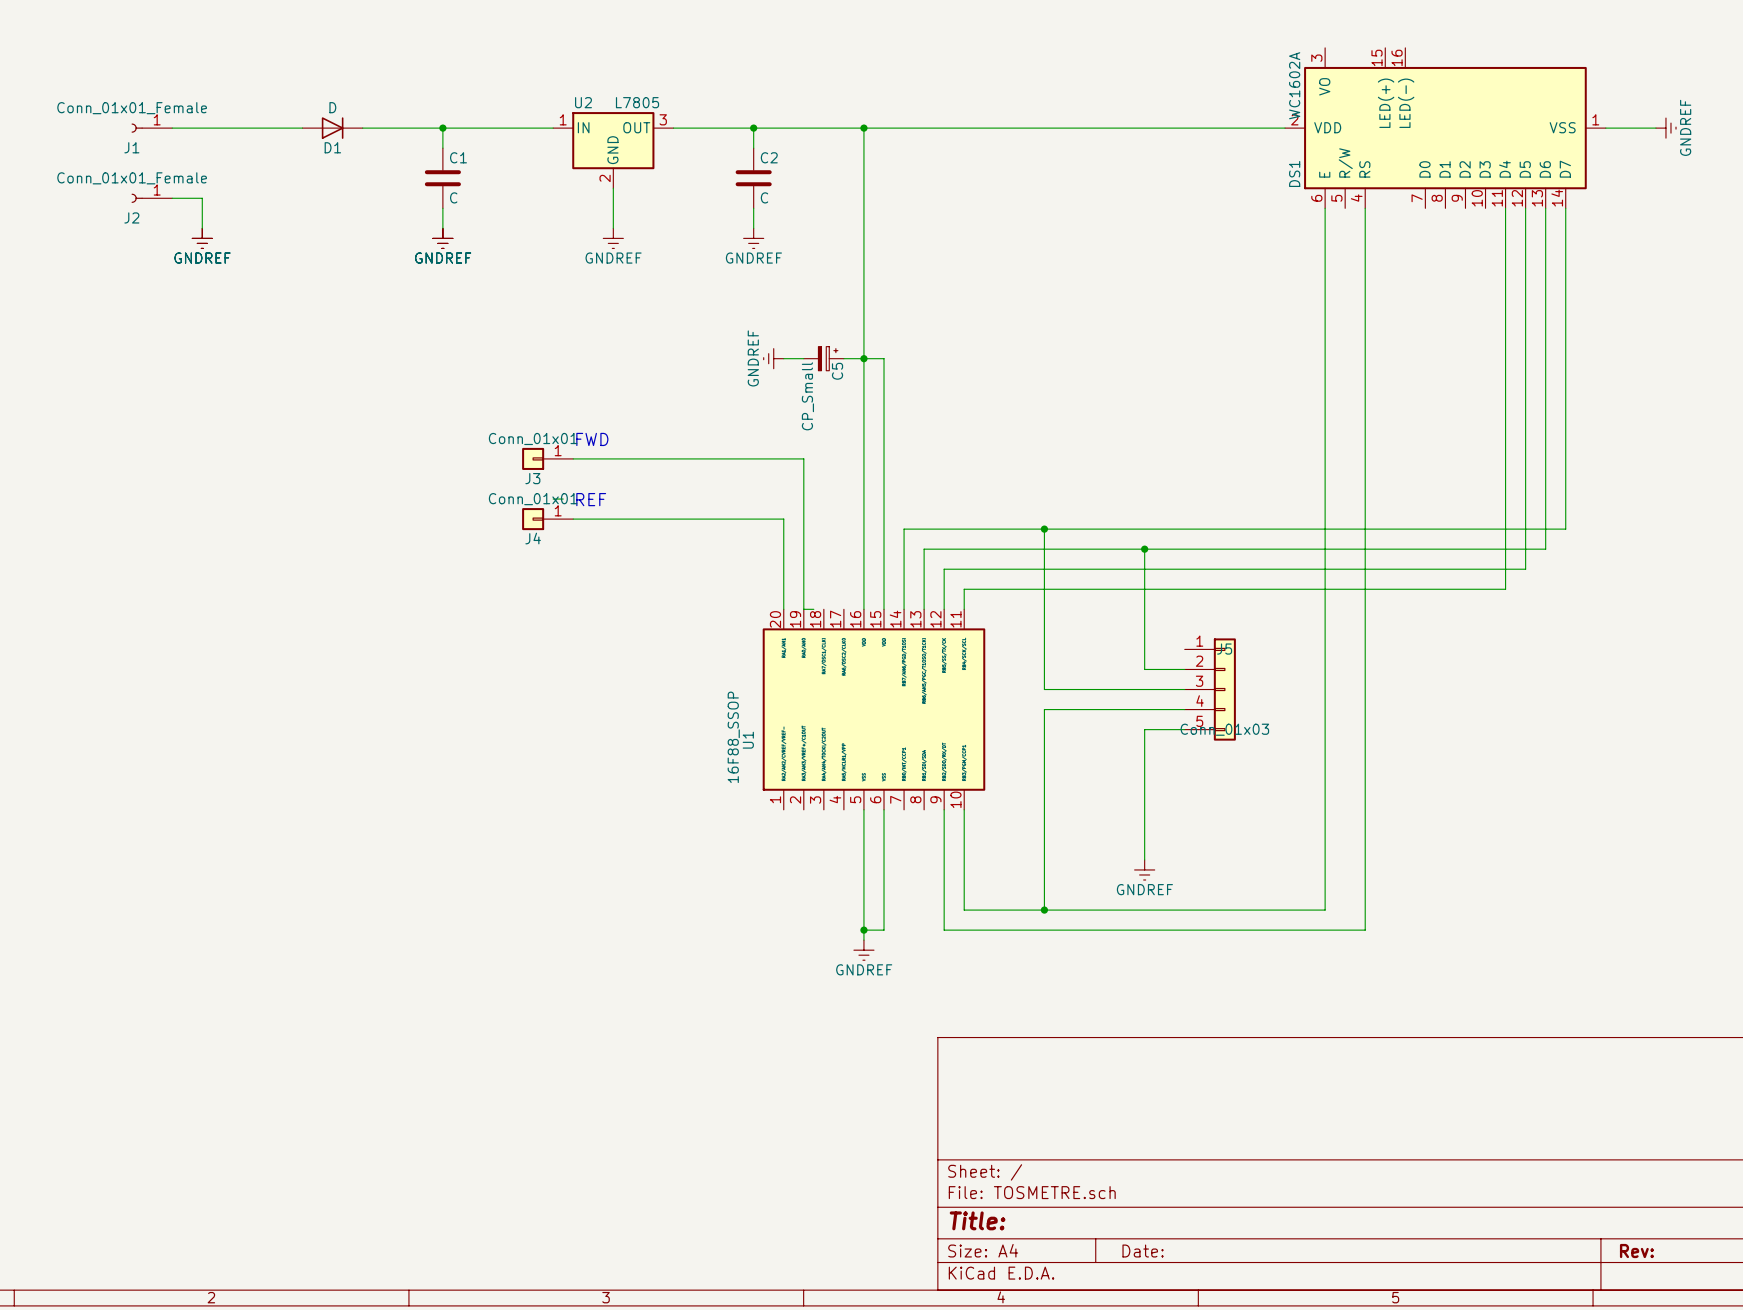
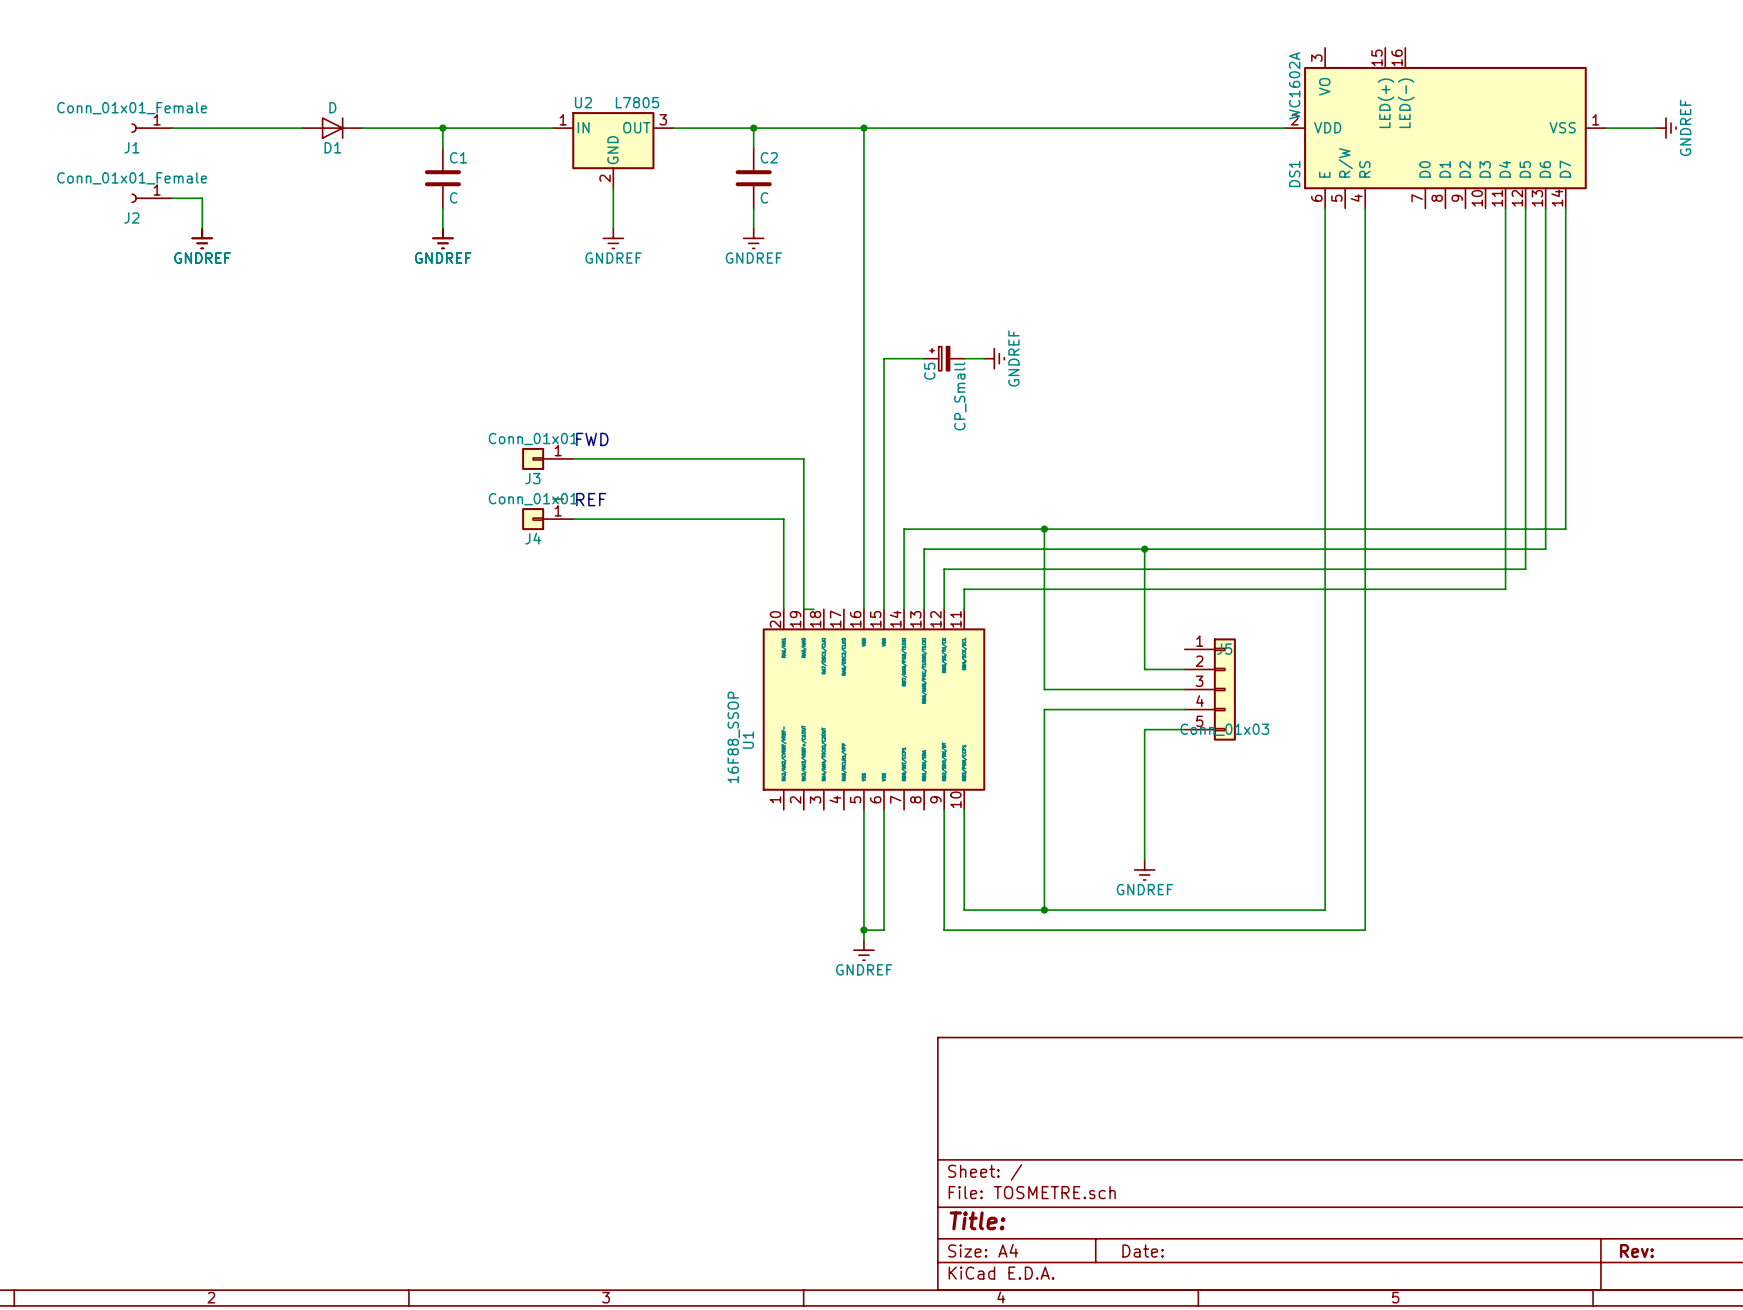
power symbol: GNDREF (773, 358) -> none
wire: (783, 358) (803, 358) -> (964, 358) (984, 358)
C5 position: (823, 358) -> (944, 358)
C5 flip: as is (828, 358) -> left-right (939, 358)
wire: (843, 358) (884, 358) -> (924, 358) (884, 358)
junction: (863, 358) -> none
power symbol: none -> GNDREF (994, 358)

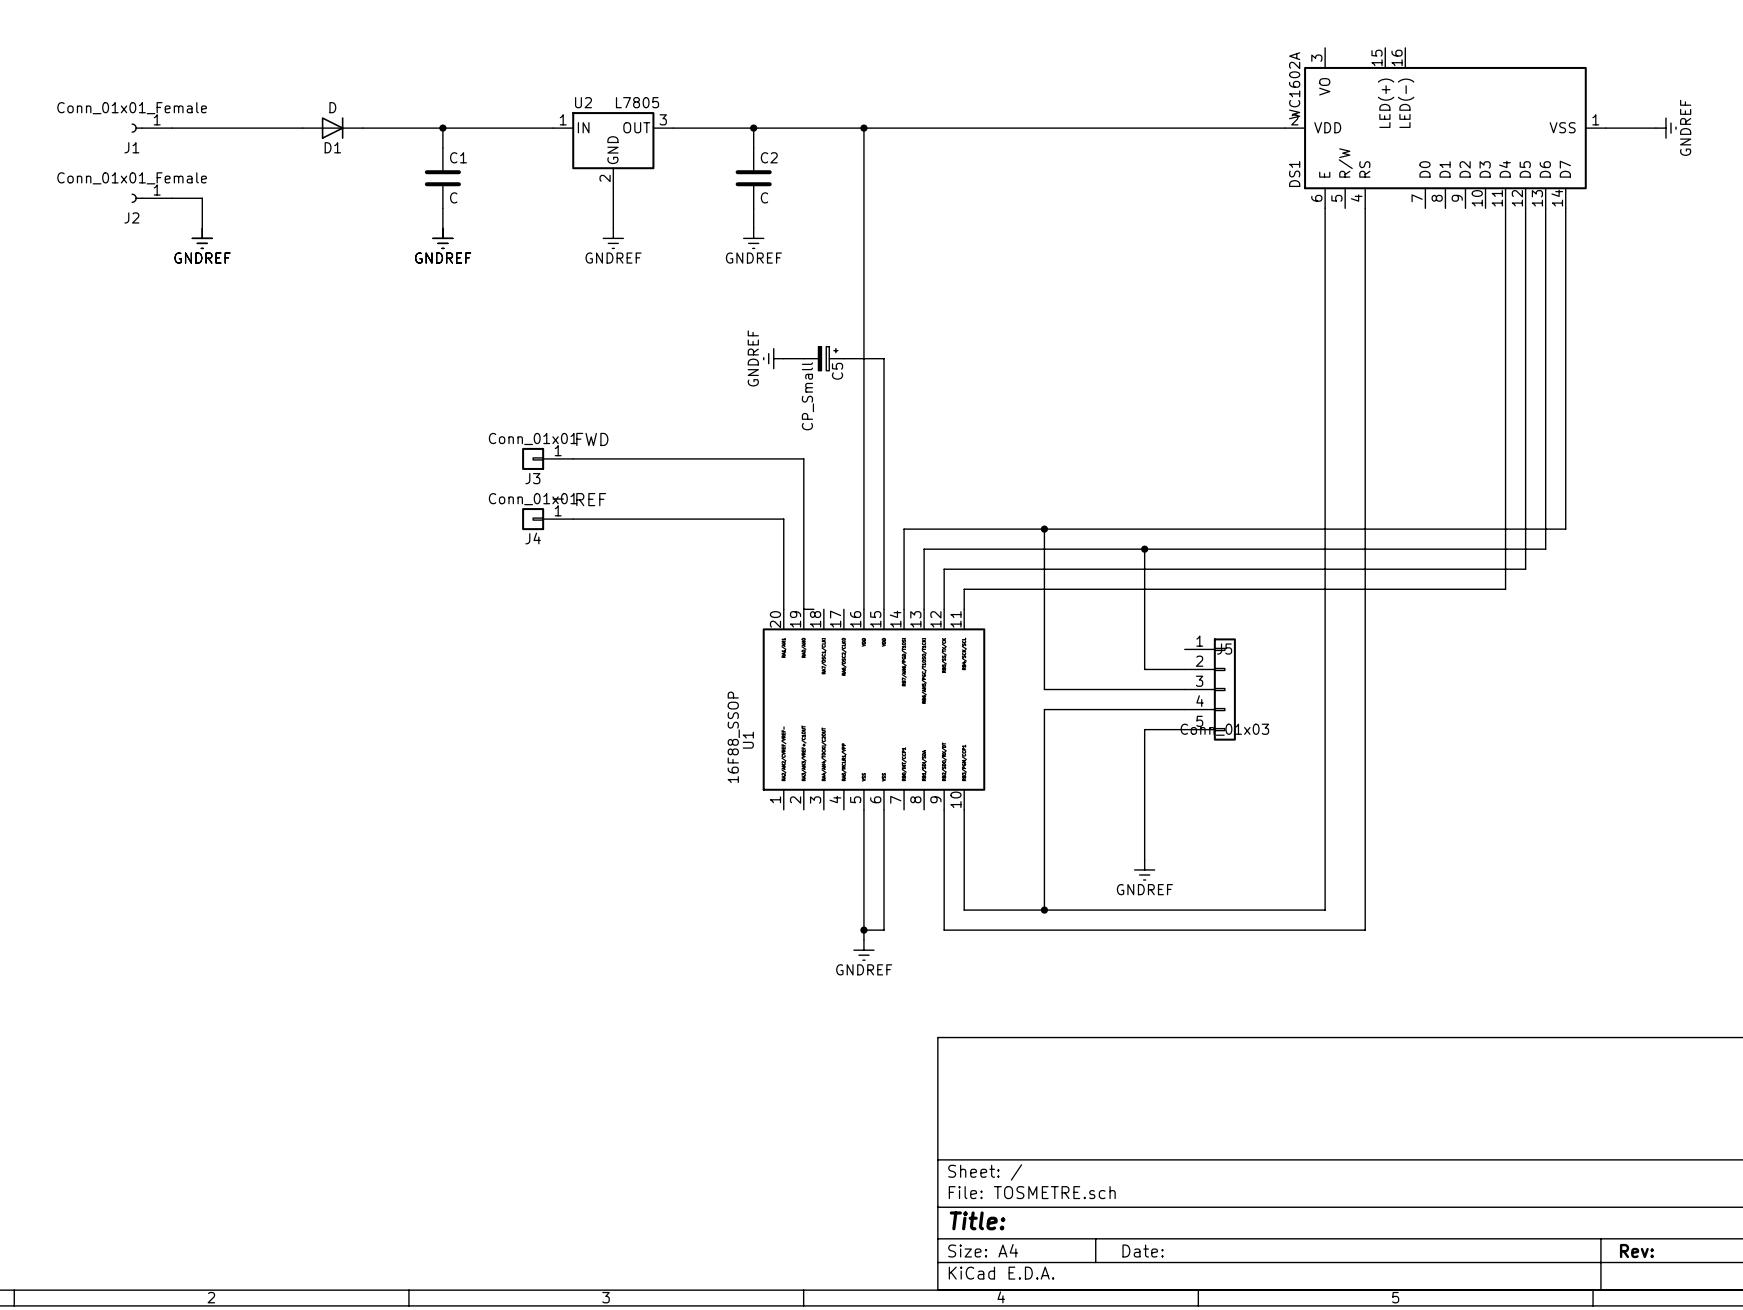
power symbol: none -> GNDREF (773, 358)
wire: (884, 358) (924, 358) -> (884, 358) (843, 358)
C5 flip: as is (939, 358) -> left-right (828, 358)
C5 position: (944, 358) -> (823, 358)
wire: (964, 358) (984, 358) -> (783, 358) (803, 358)
power symbol: GNDREF (994, 358) -> none

